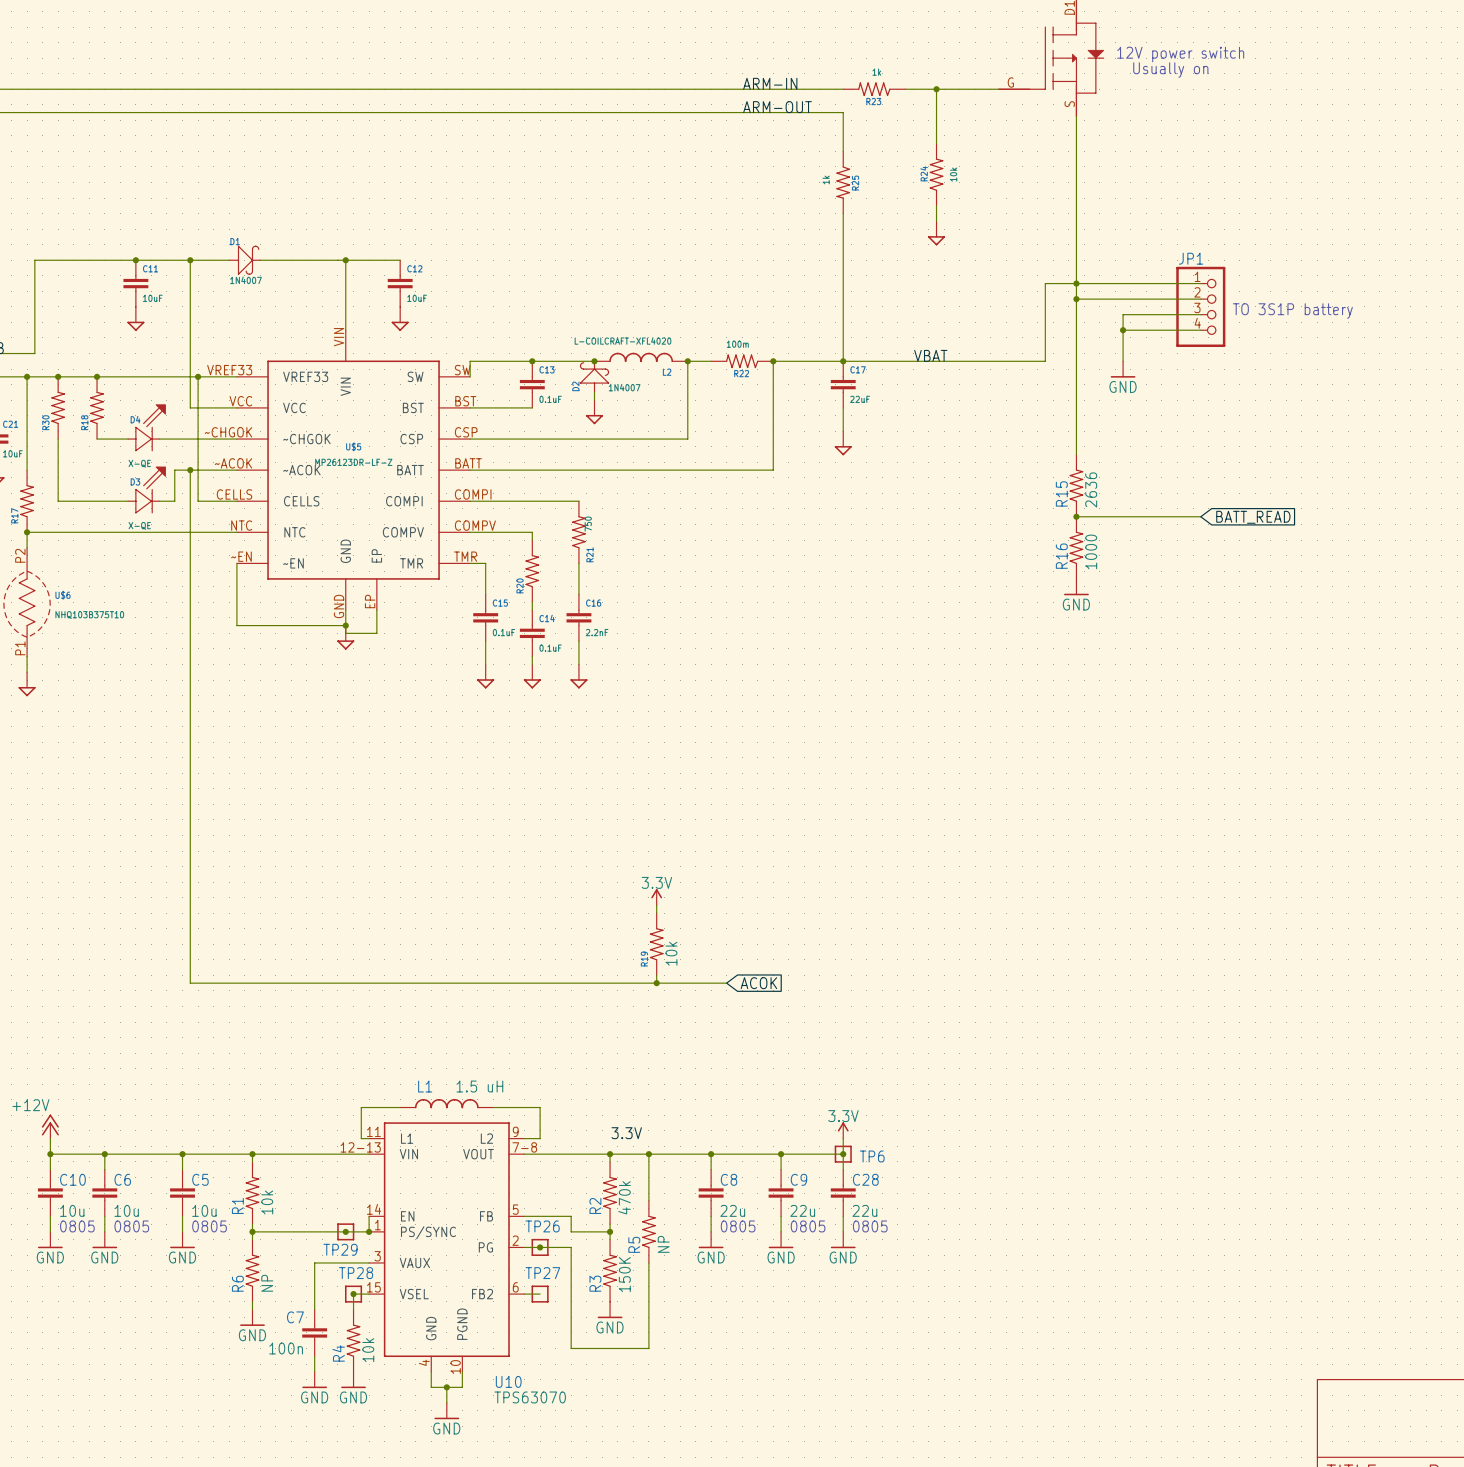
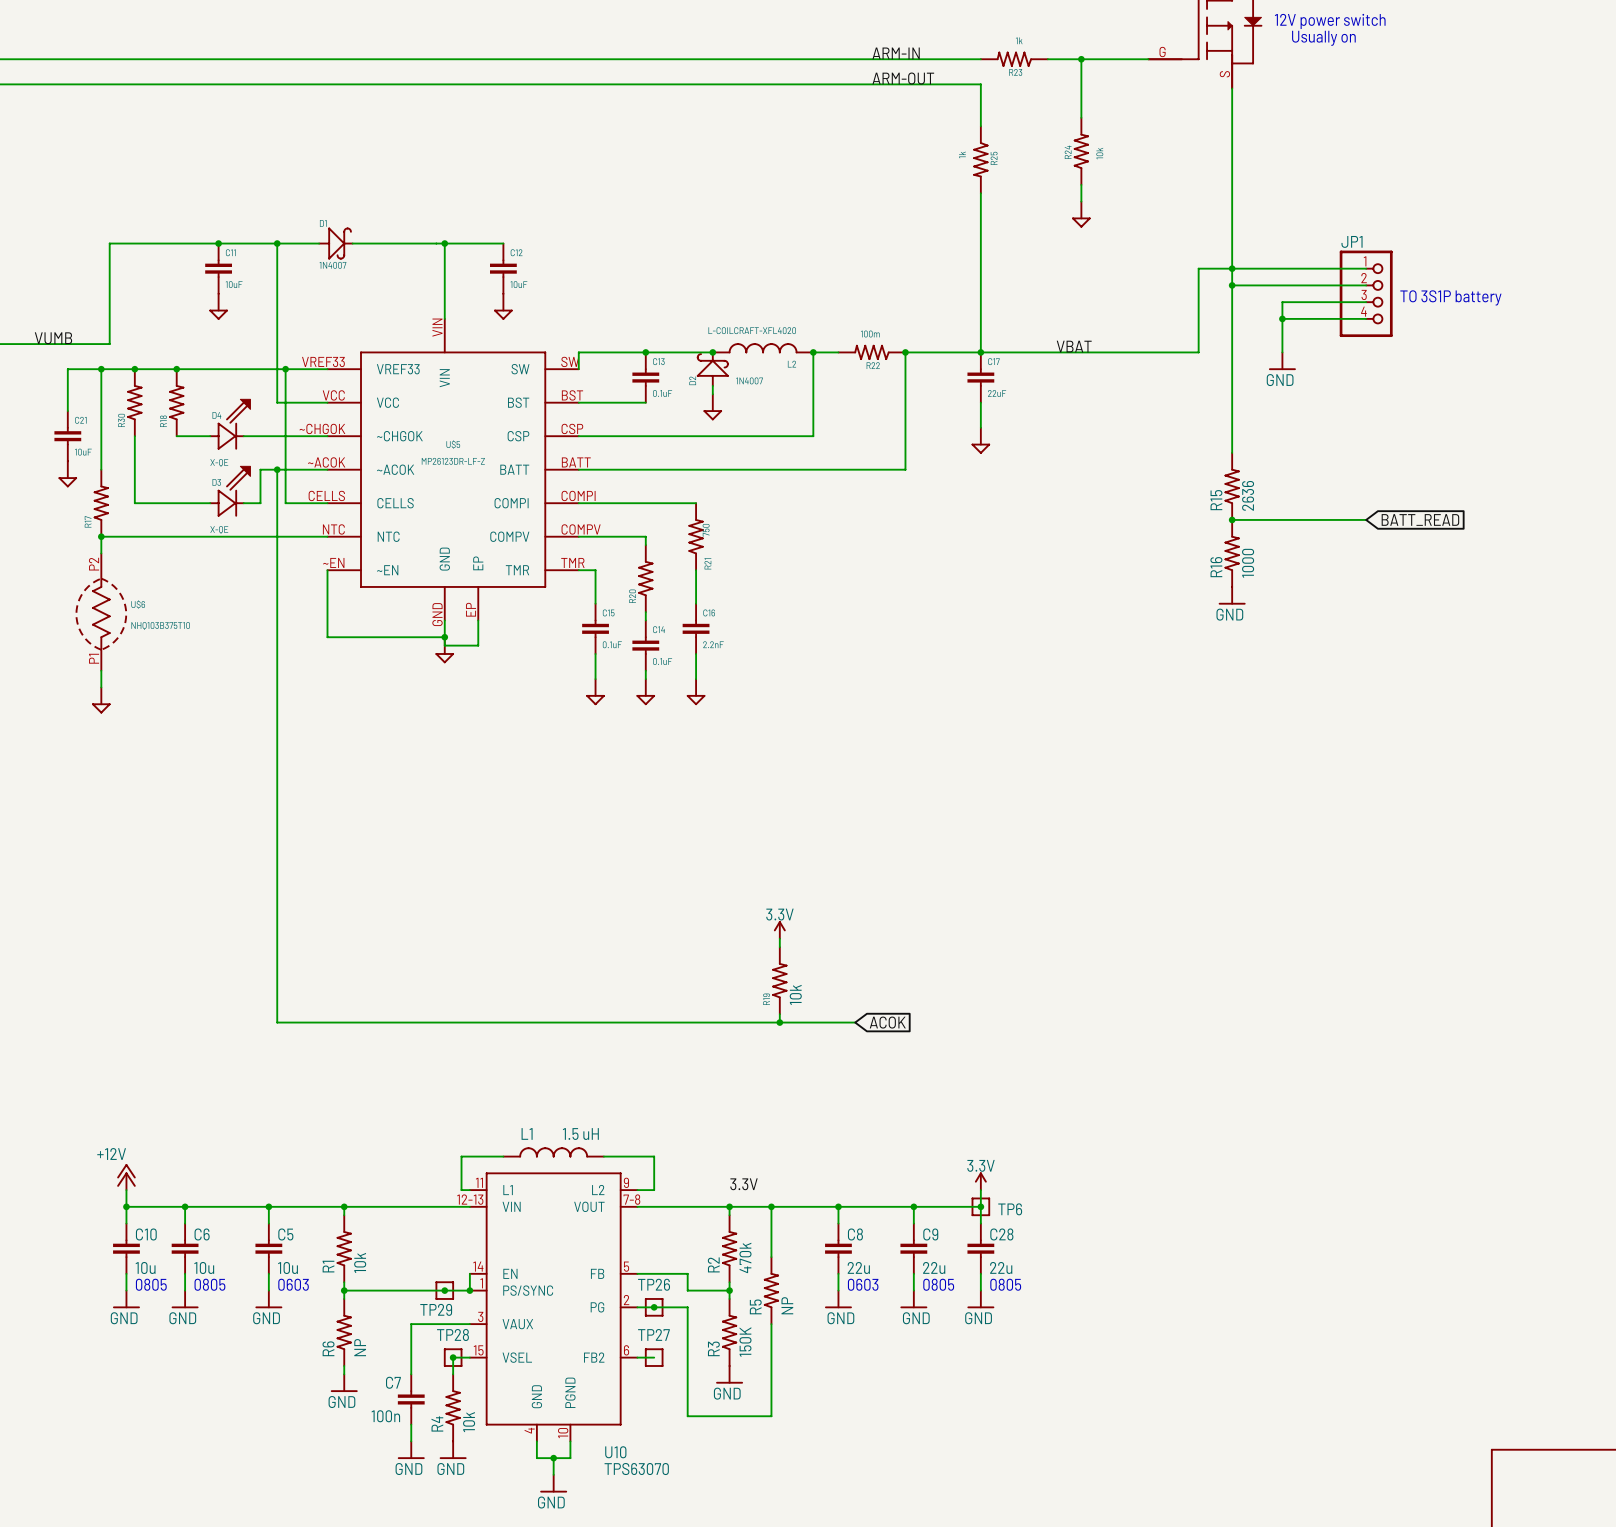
text: 0805 (209, 1226) -> 0603 (293, 1284)
text: 0805 (738, 1226) -> 0603 (863, 1284)

